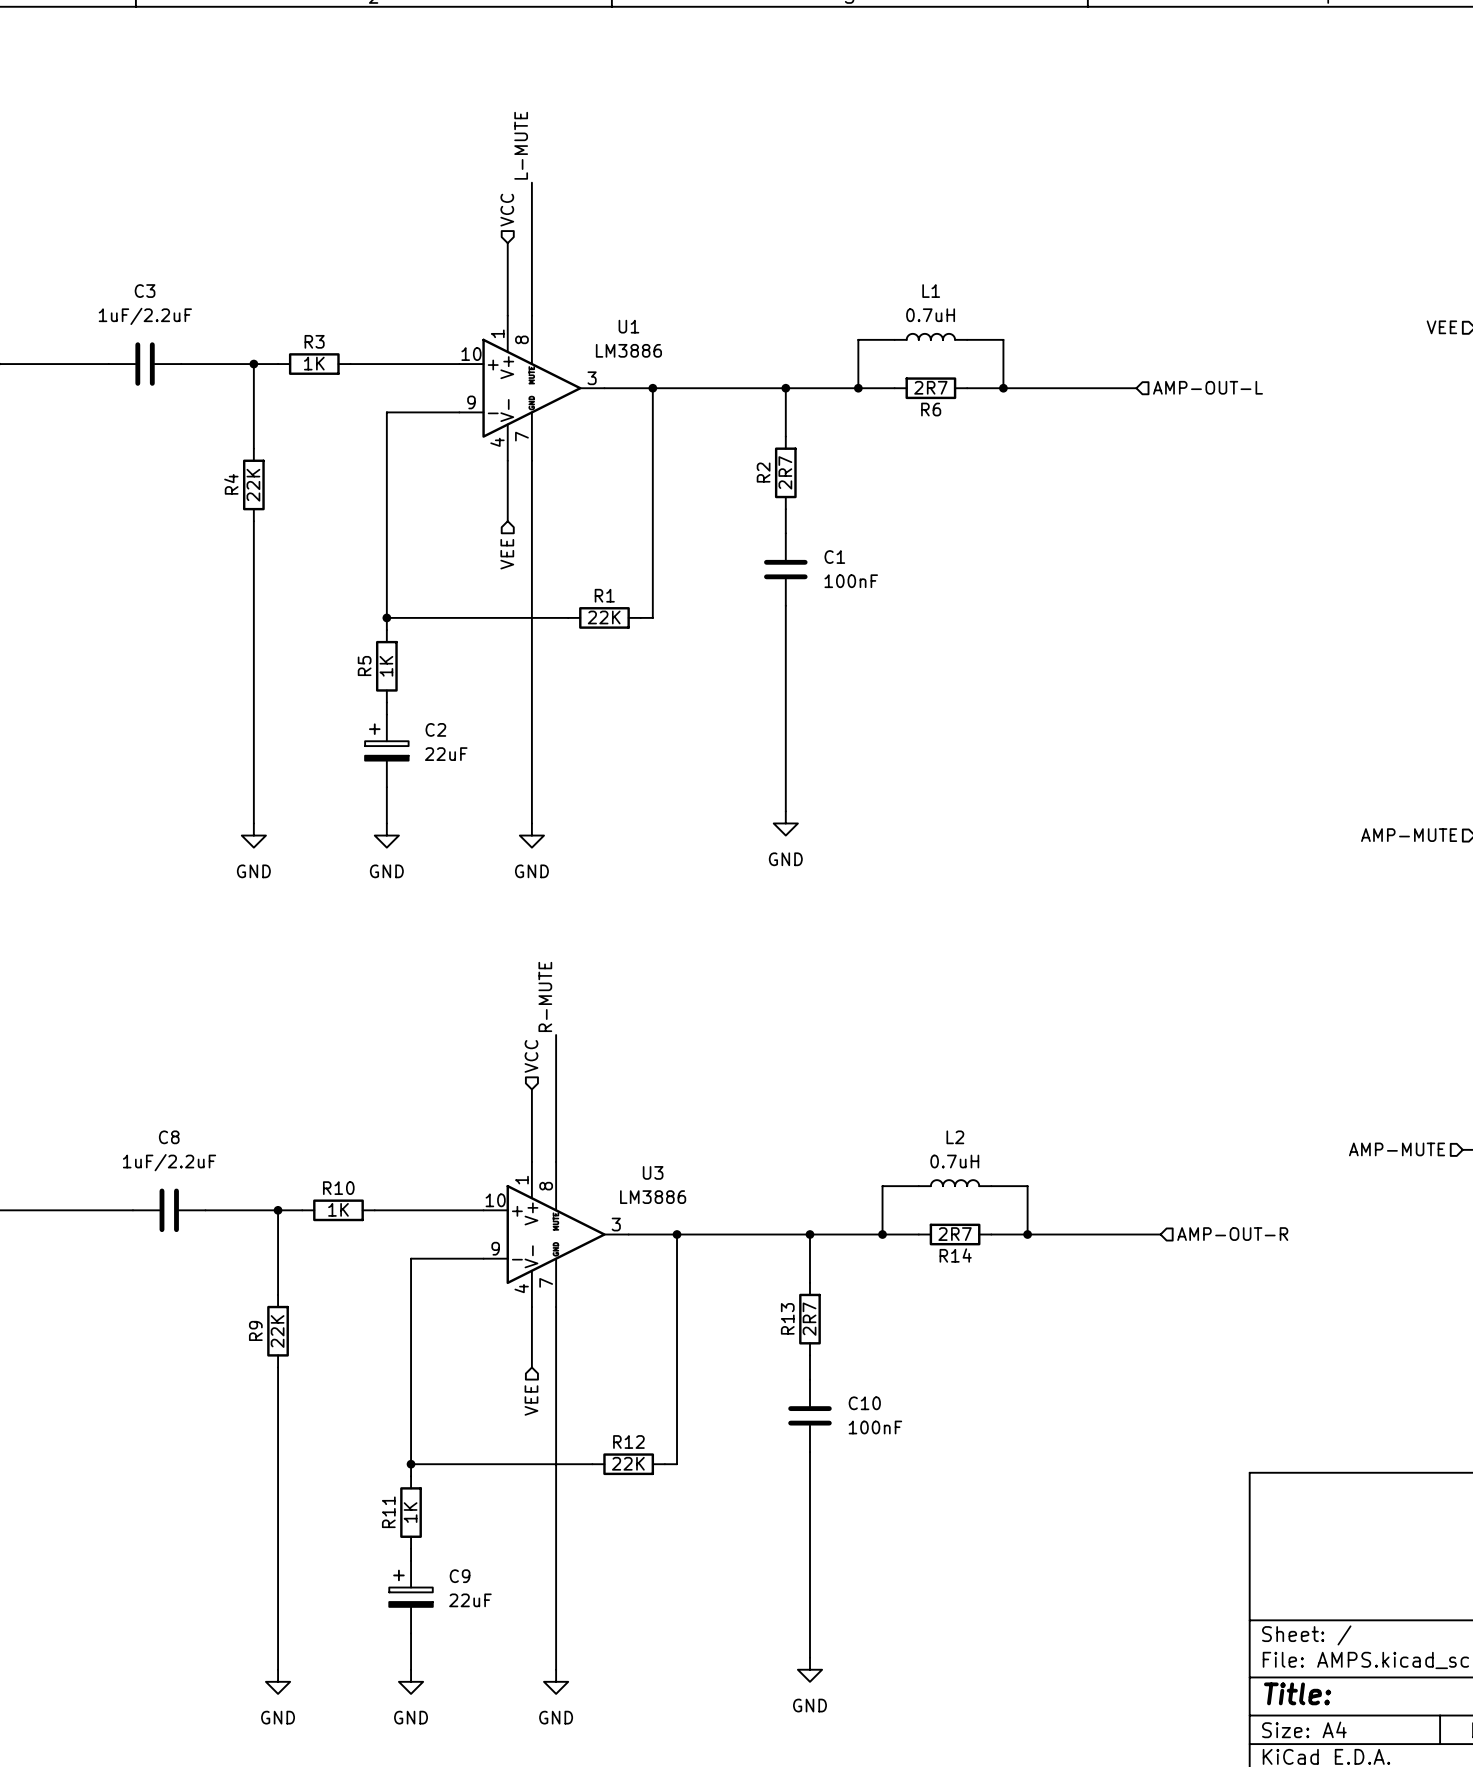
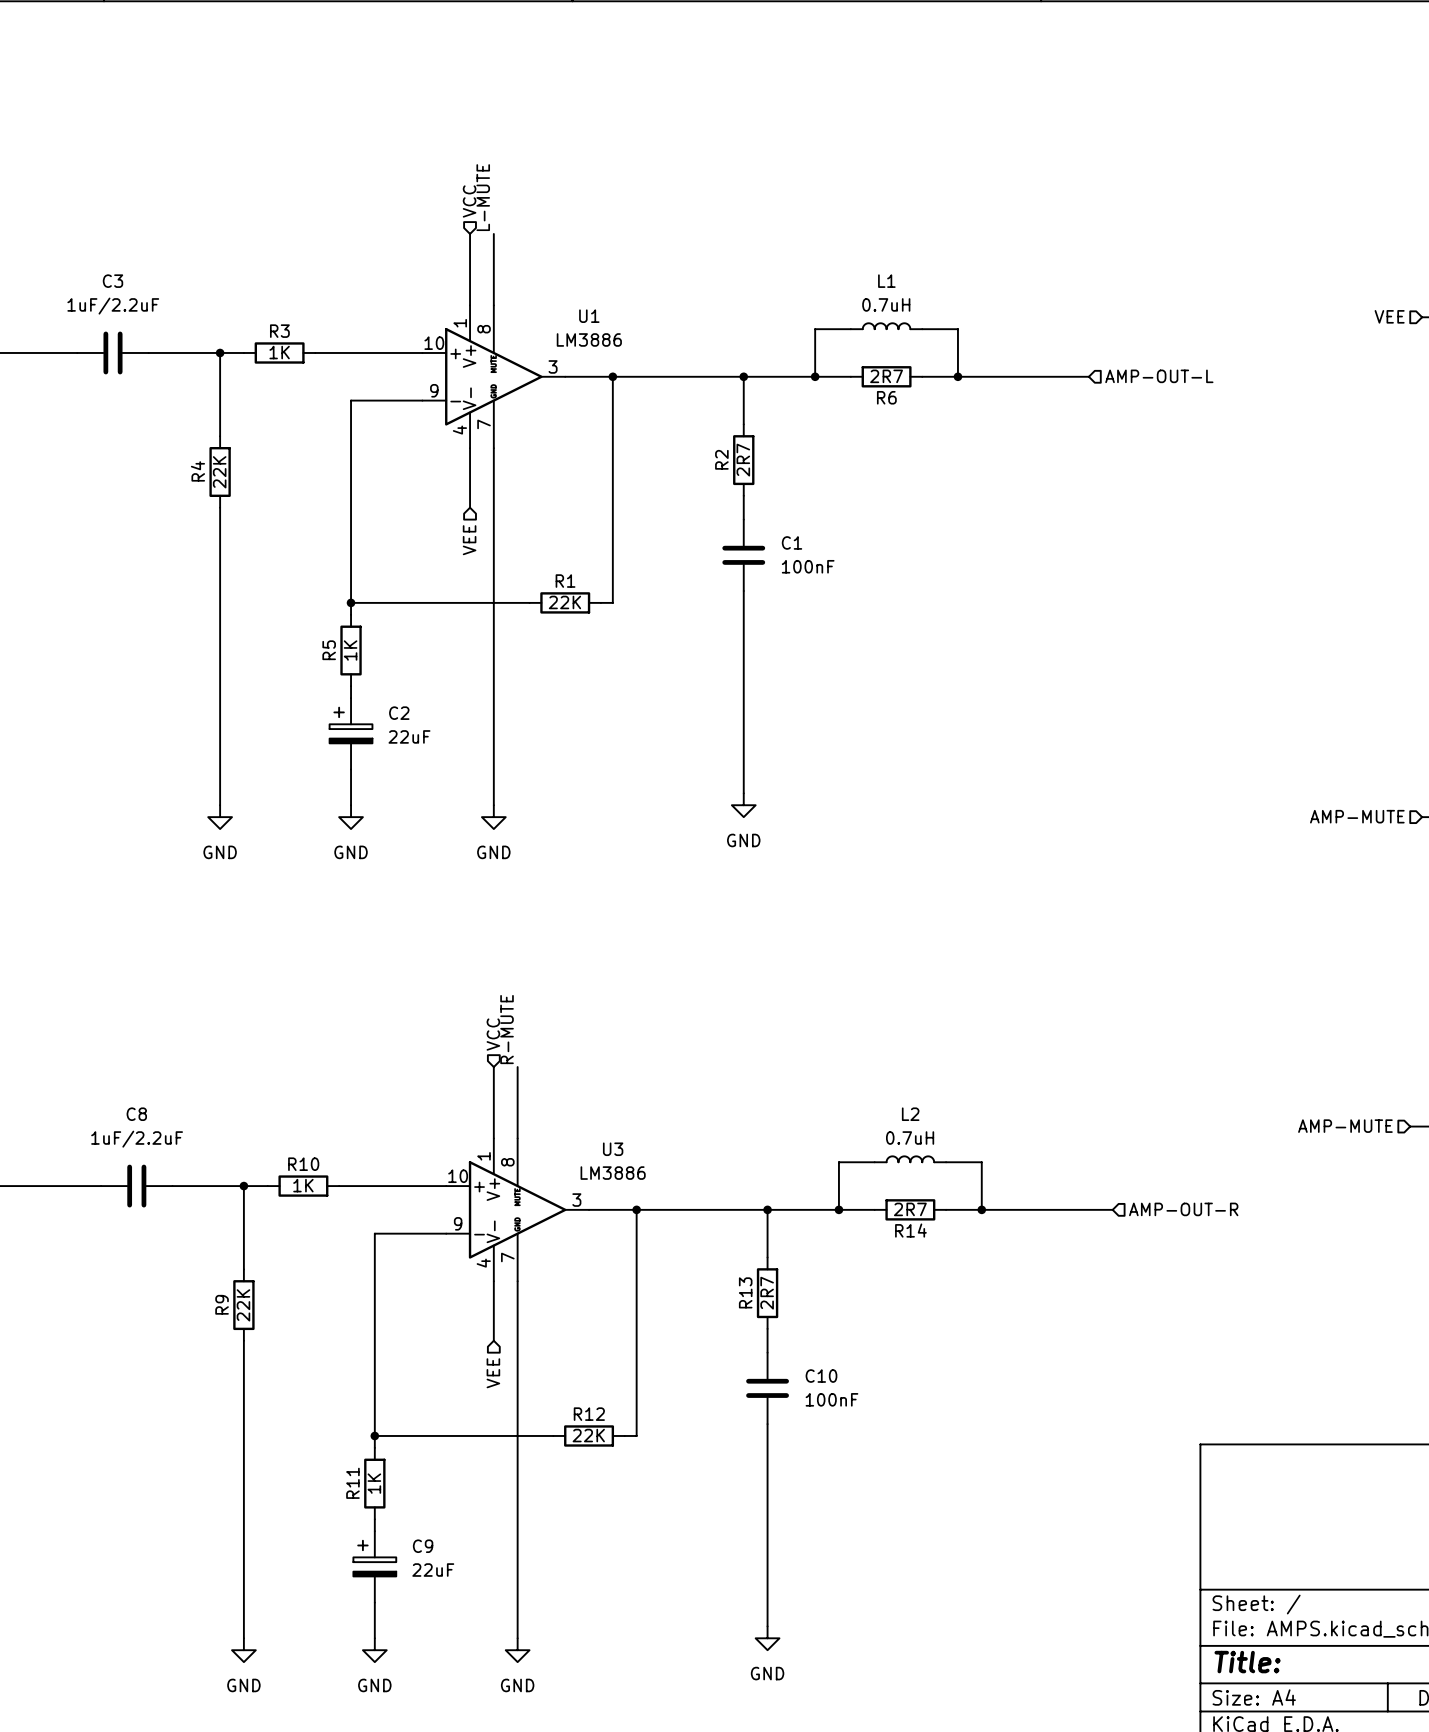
label position: L-MUTE (521, 145) -> L-MUTE (483, 197)
wire: (531, 182) (531, 243) -> none
label position: R-MUTE (545, 996) -> R-MUTE (507, 1029)
wire: (556, 1035) (556, 1089) -> none

